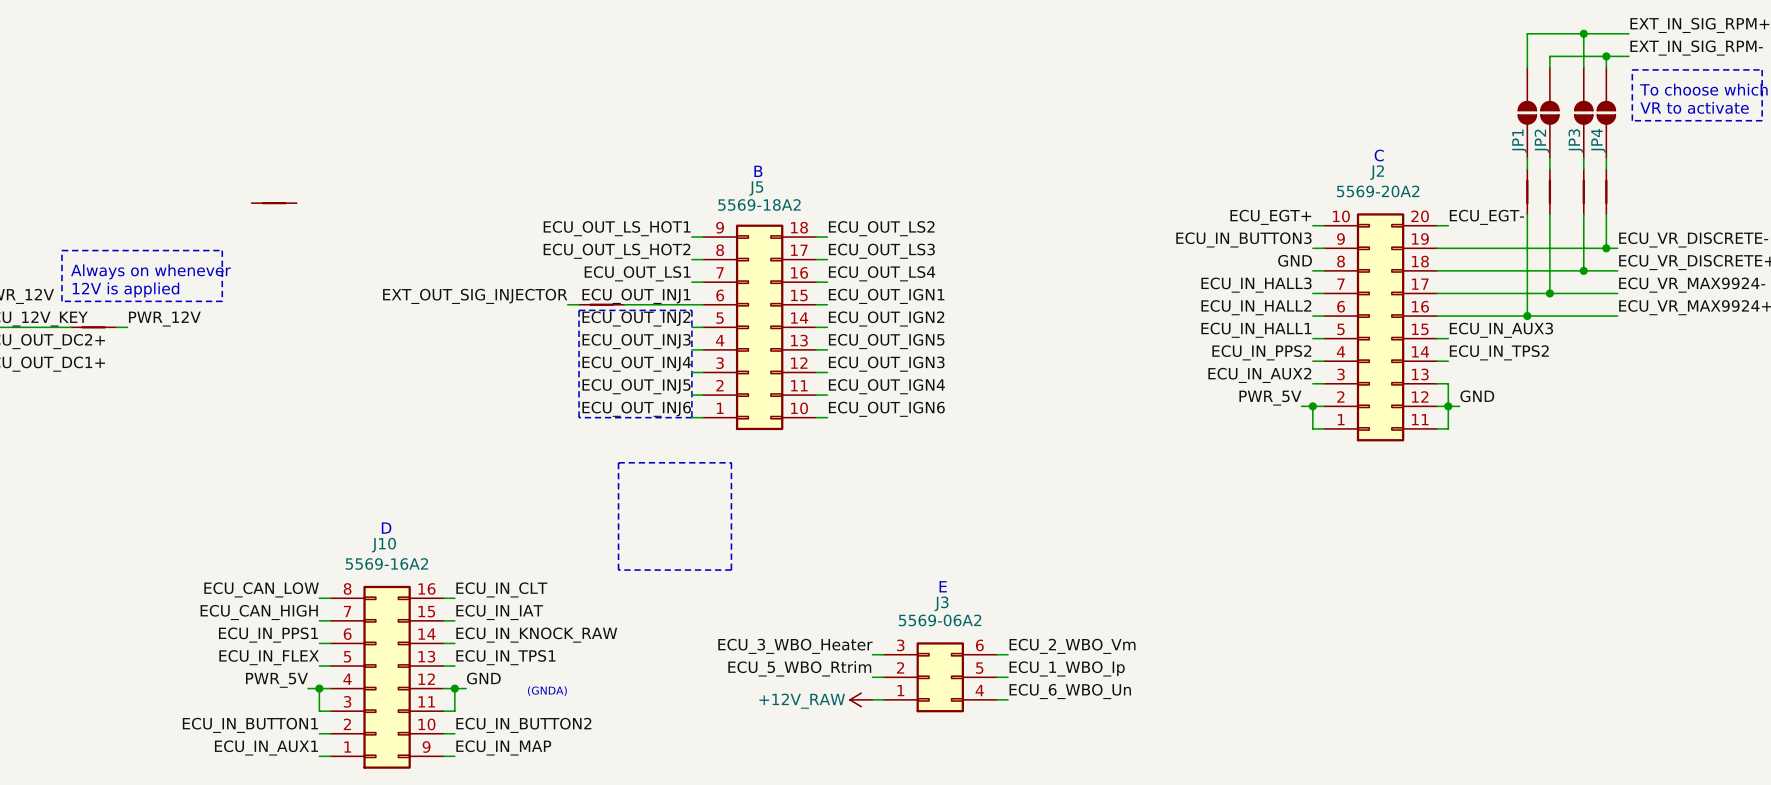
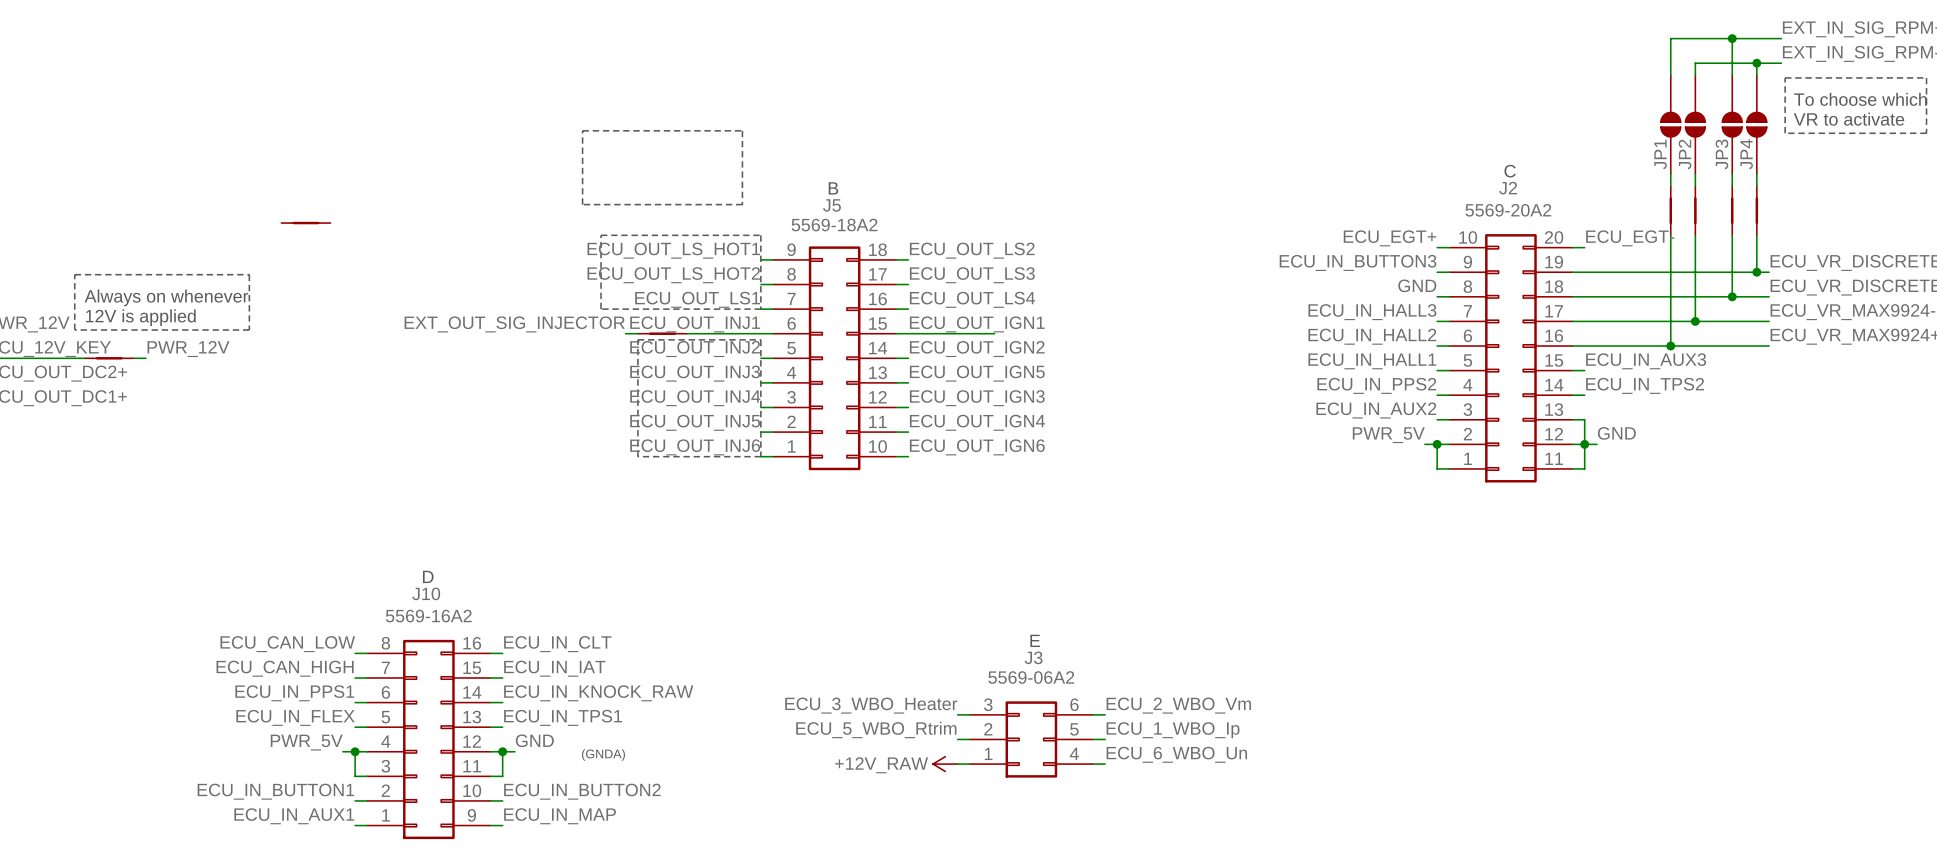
line: none -> (582, 130) (742, 130) (742, 204) (582, 204) (582, 130)
line: none -> (601, 235) (760, 235) (760, 309) (601, 309) (601, 235)
wire: none -> (908, 333) (994, 333)
line: (618, 462) (731, 462) (731, 570) (618, 570) (618, 462) -> none

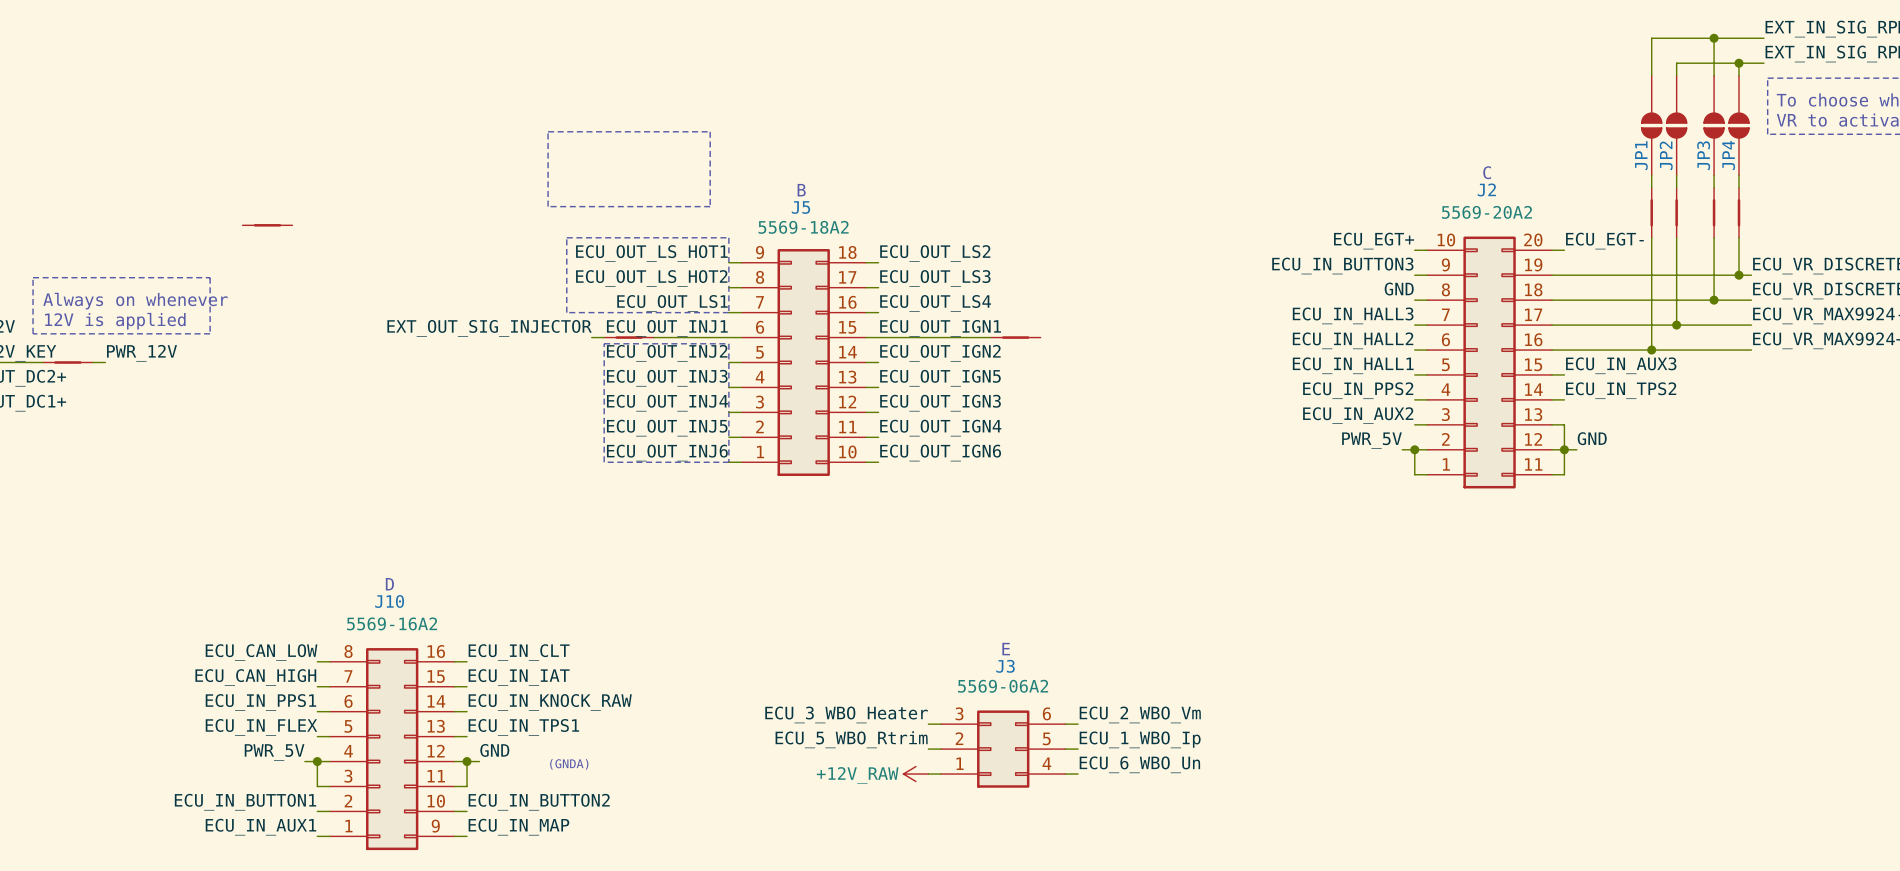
wire: none -> (965, 337) (990, 337)
part: none -> (1015, 337)

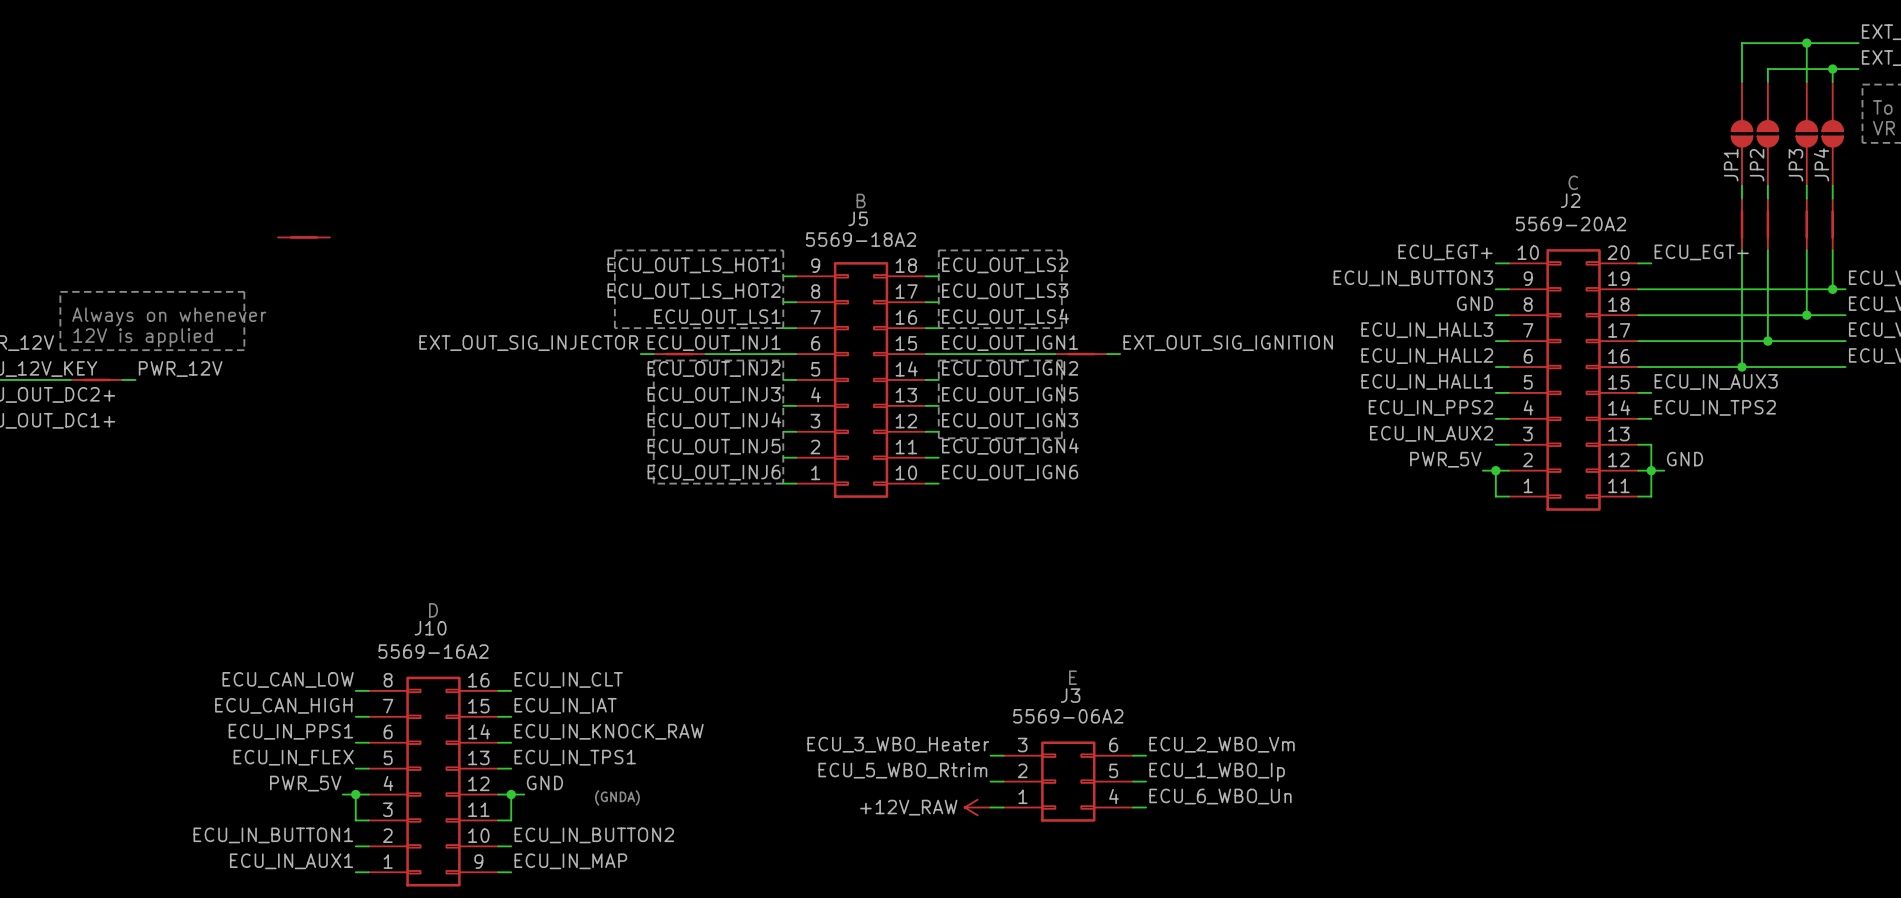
line: (548, 131) (710, 131) (710, 206) (548, 206) (548, 131) -> none
line: none -> (938, 250) (938, 328) (1061, 328) (1061, 250) (938, 250)
label: none -> EXT_OUT_SIG_IGNITION (1228, 343)
wire: none -> (1107, 354) (1120, 354)
line: none -> (938, 360) (1061, 360) (1061, 438) (938, 438) (938, 360)

